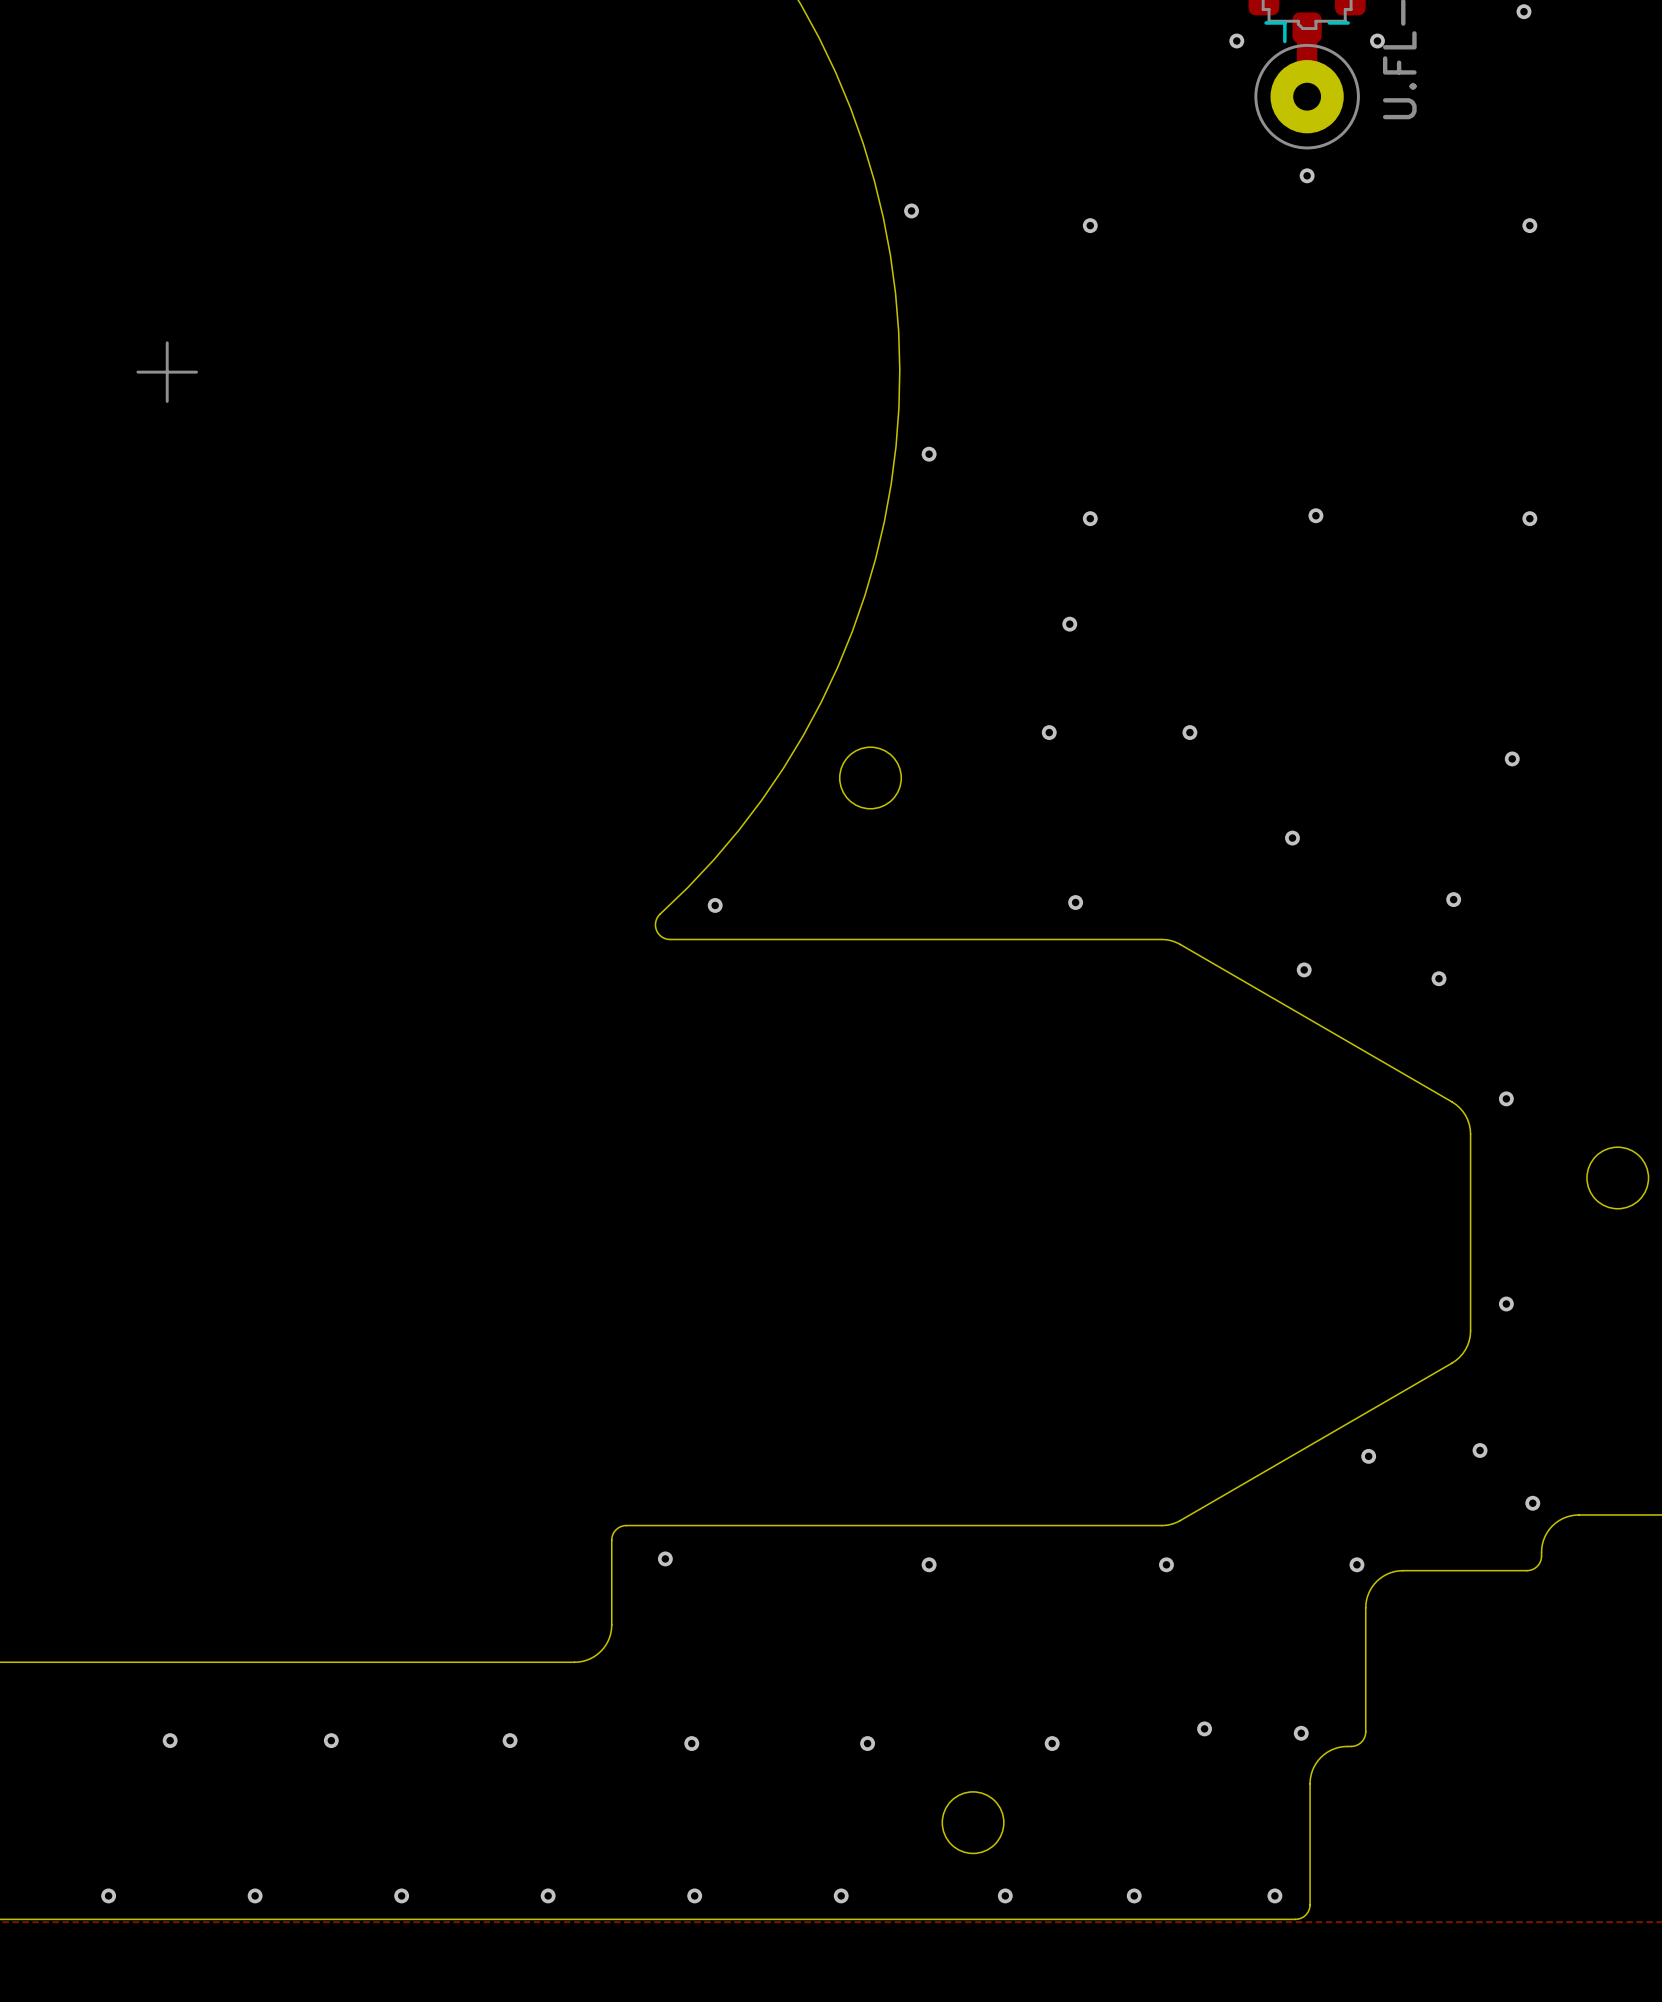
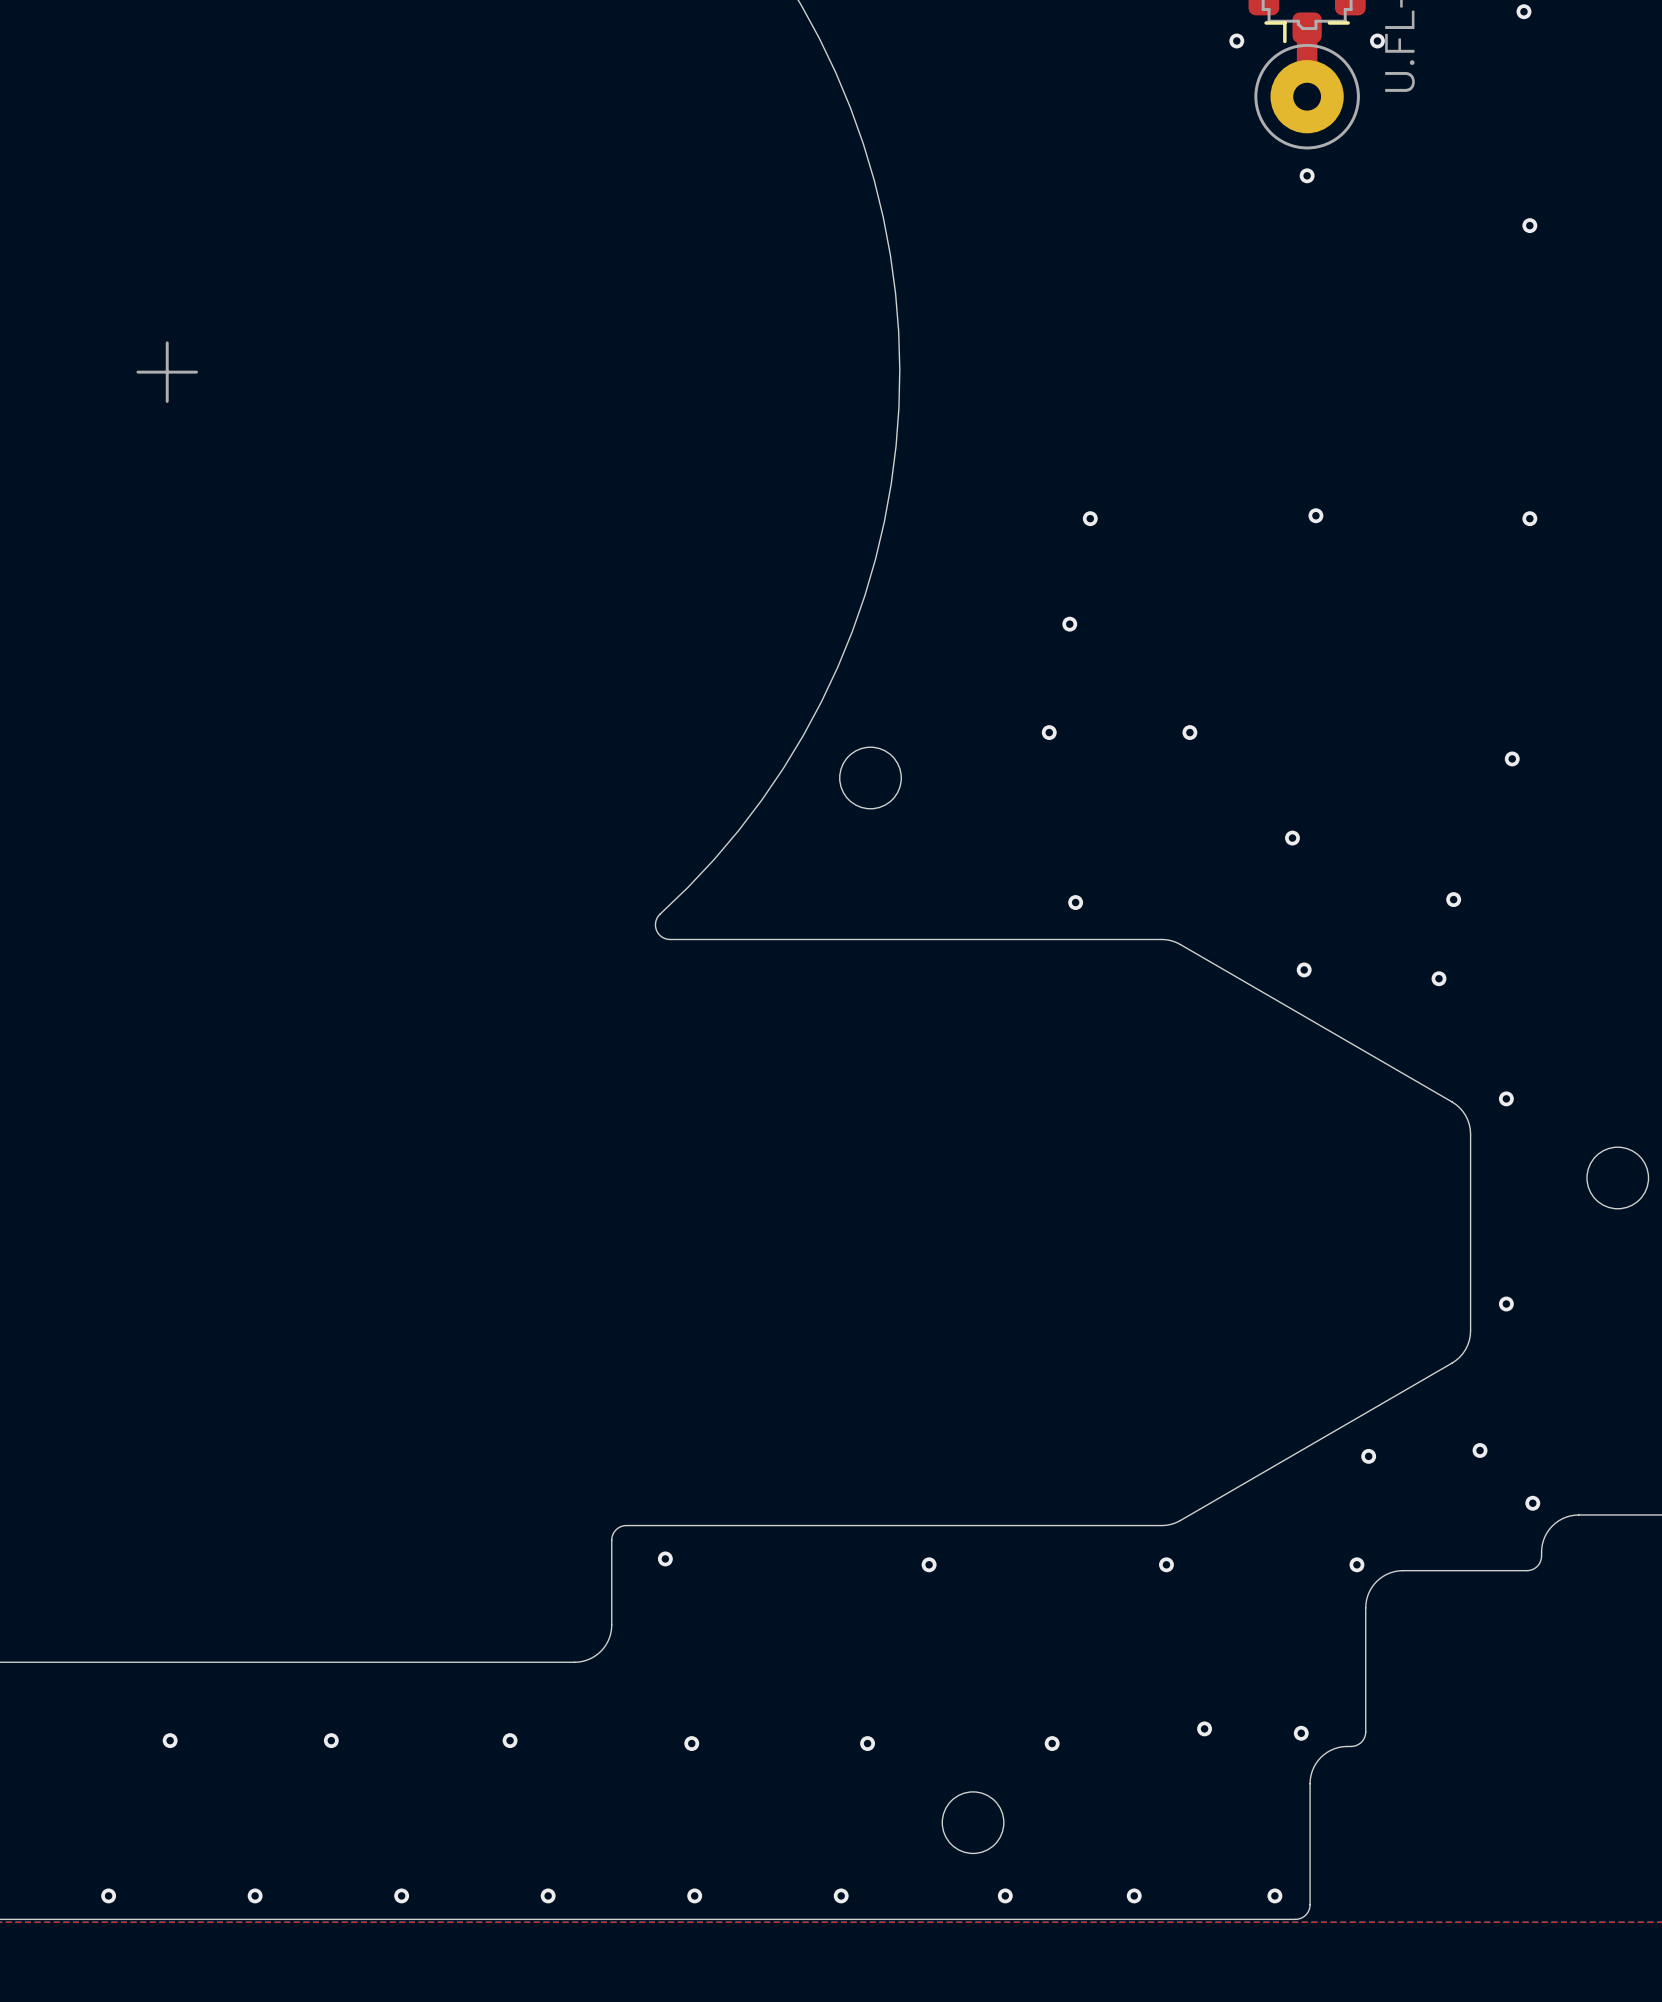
via: (911, 210) -> none
via: (1090, 225) -> none
via: (929, 454) -> none
via: (715, 905) -> none

